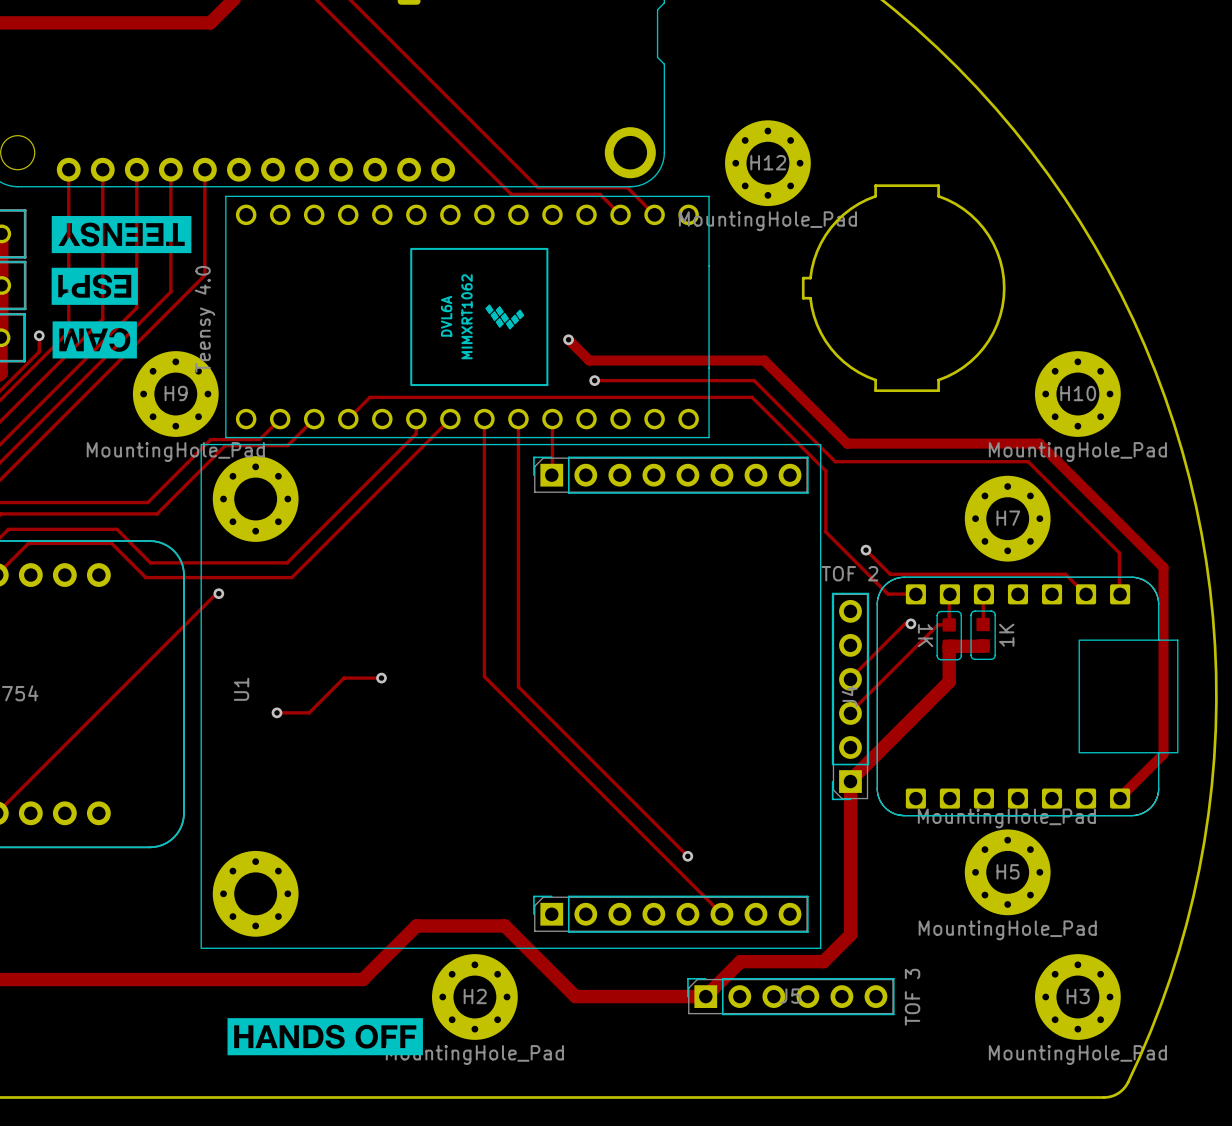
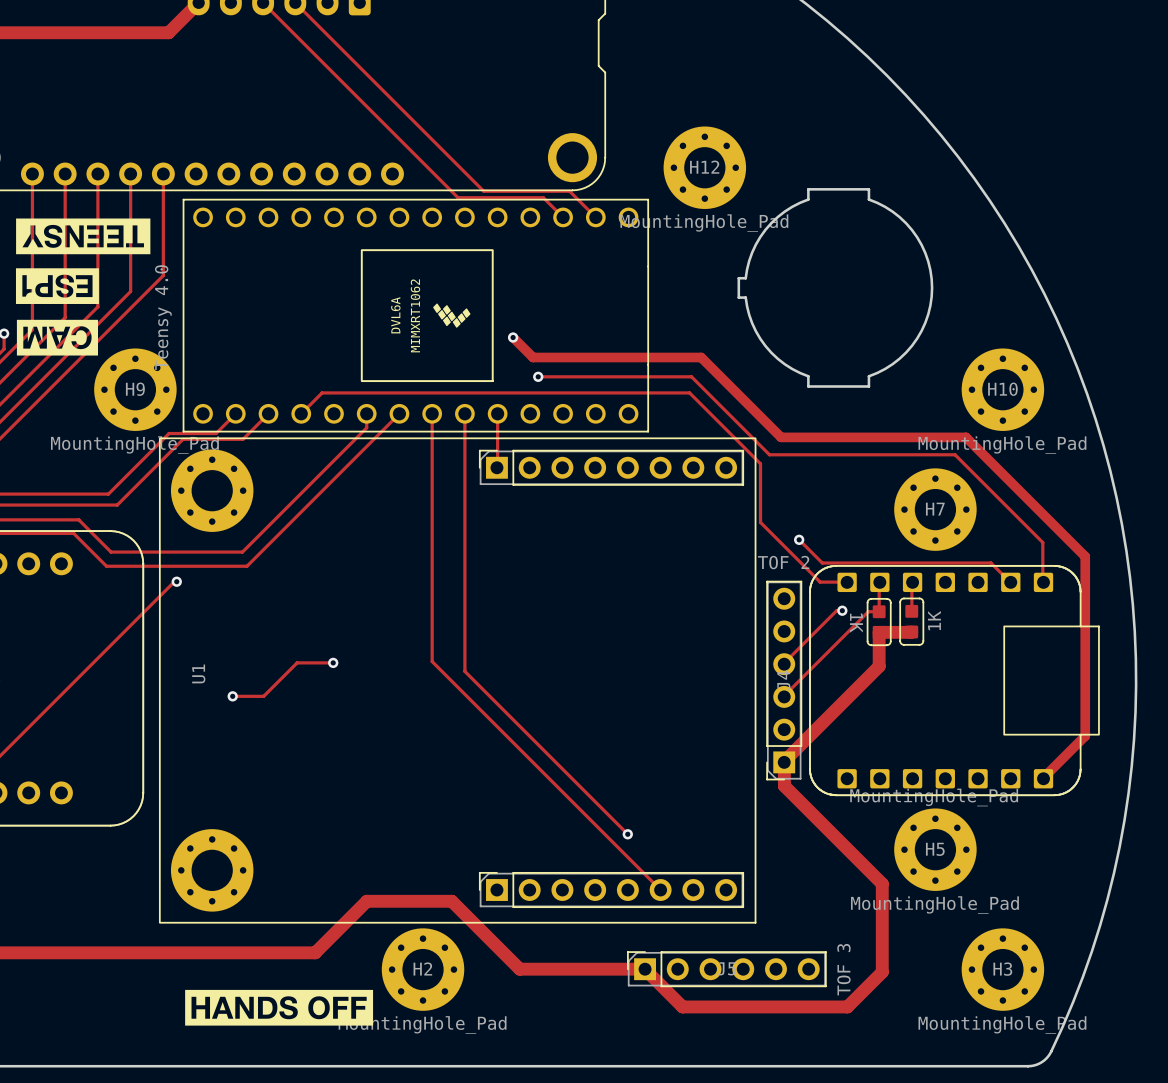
track: (850, 806) (850, 934) (823, 961) (740, 961) (705, 996) -> (784, 786) (882, 883) (882, 972) (847, 1006) (682, 1006) (644, 969)

